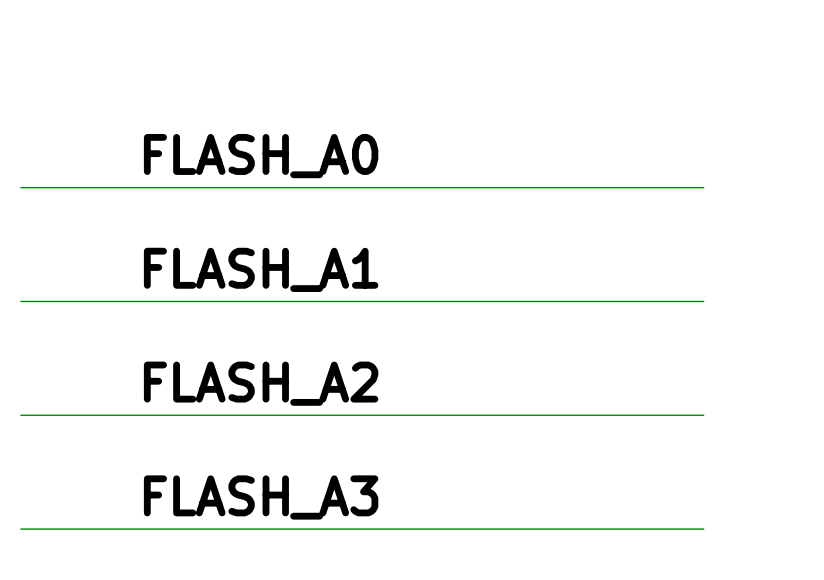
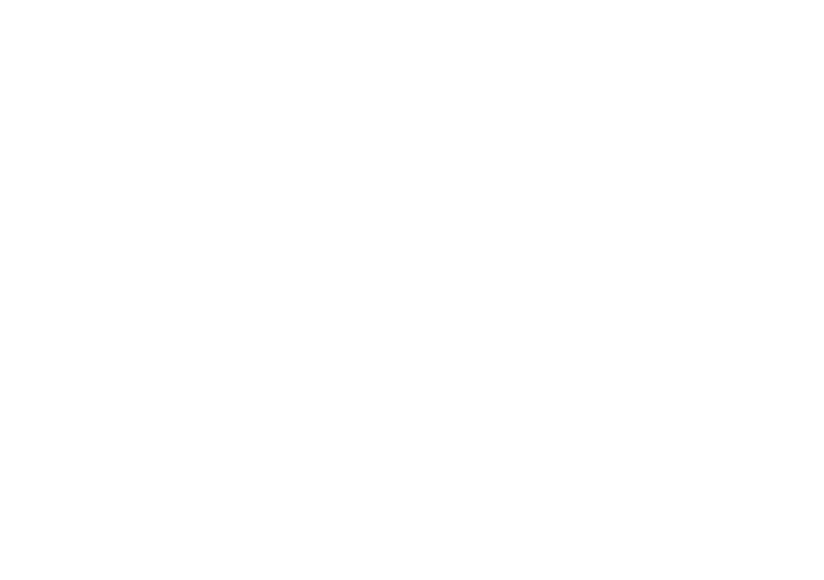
label: FLASH_A0 (261, 156) -> none
wire: (20, 187) (703, 187) -> none
label: FLASH_A1 (261, 269) -> none
wire: (20, 301) (703, 301) -> none
label: FLASH_A2 (261, 383) -> none
wire: (20, 415) (703, 415) -> none
label: FLASH_A3 (261, 497) -> none
wire: (20, 529) (703, 529) -> none

